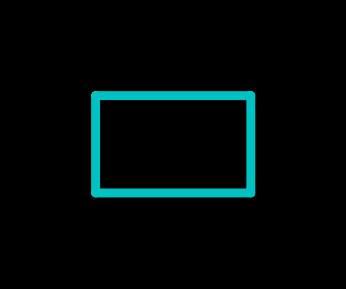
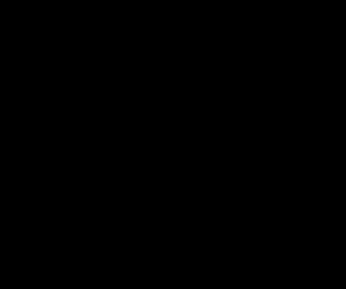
line: (95, 95) (250, 95) (250, 192) (95, 192) (95, 95) -> none

